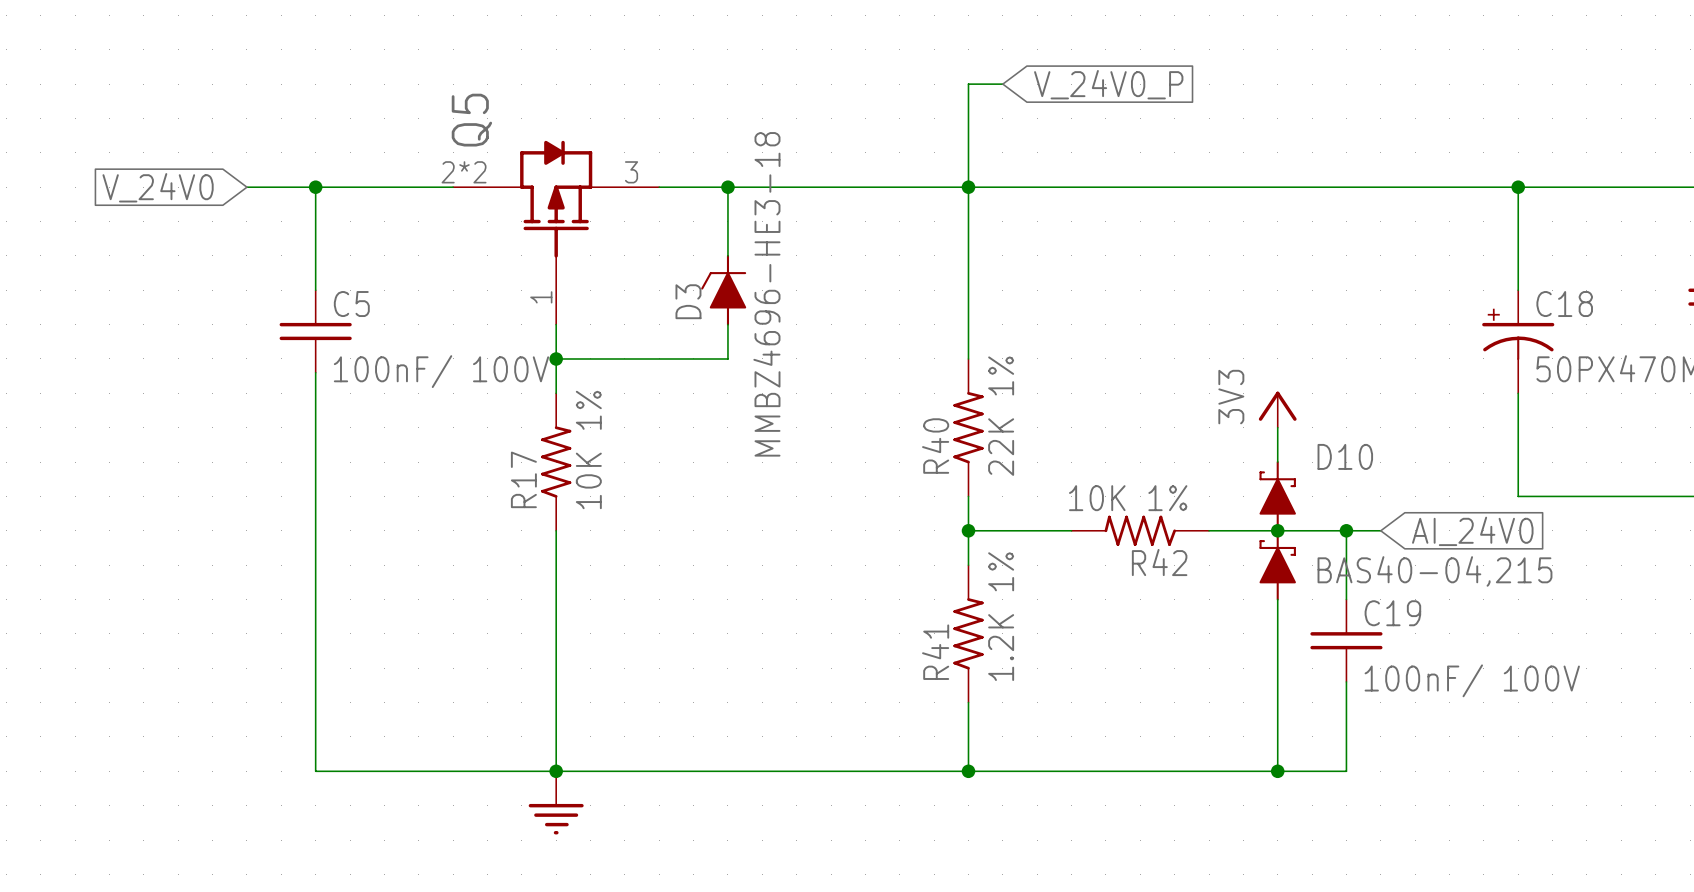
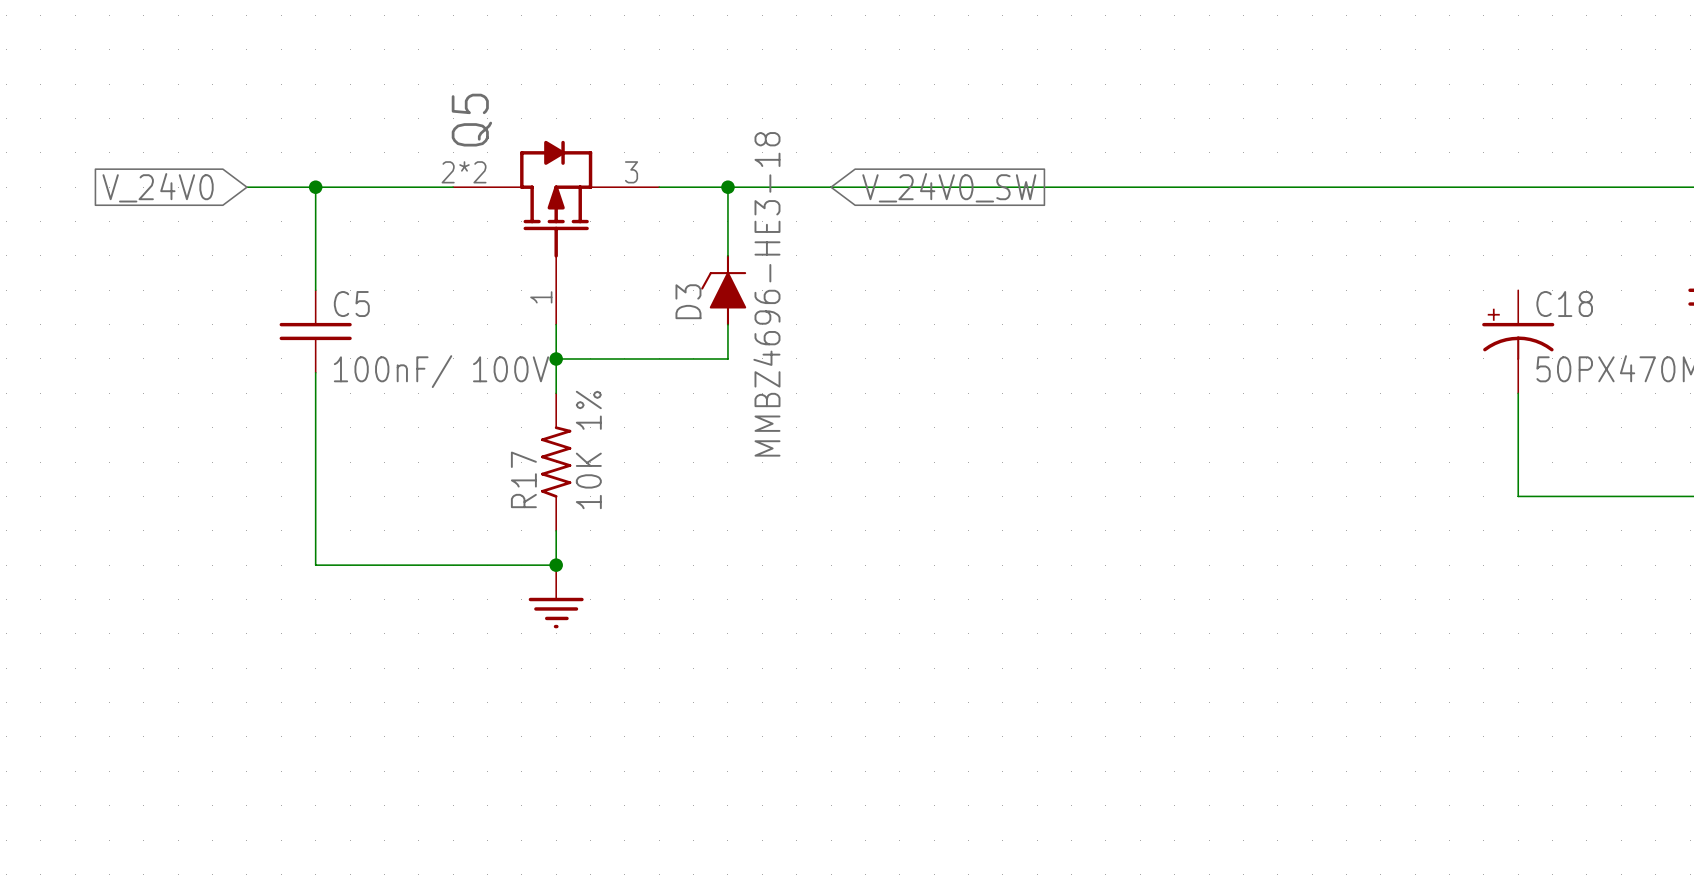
wire: (1002, 84) (968, 84) (968, 358) -> none
global label: V_24V0_P (1108, 84) -> none
global label: none -> V_24V0_SW (949, 187)
junction: (968, 187) -> none
wire: (1518, 187) (1518, 290) -> none
junction: (1518, 187) -> none
power symbol: 3V3 (1277, 409) -> none
R40: 22K 1% (968, 427) -> none
wire: (1277, 427) (1277, 462) -> none
wire: (968, 496) (968, 565) -> none
wire: (968, 530) (1071, 530) -> none
junction: (968, 530) -> none
R42: 10K 1% (1140, 530) -> none
wire: (1209, 530) (1380, 530) -> none
D10: BAS40-04,215 (1277, 530) -> none
junction: (1277, 530) -> none
wire: (1346, 530) (1346, 599) -> none
junction: (1346, 530) -> none
global label: AI_24V0 (1472, 531) -> none
wire: (315, 565) (315, 771) (1346, 771) (1346, 681) -> none
wire: (556, 565) (556, 771) -> (556, 565) (315, 565)
junction: none -> (556, 565)
wire: (1277, 599) (1277, 771) -> none
R41: 1.2K 1% (968, 633) -> none
C19: 100nF/ 100V (1346, 640) -> none
wire: (968, 702) (968, 771) -> none
junction: (556, 771) -> none
junction: (968, 771) -> none
junction: (1277, 771) -> none
power symbol position: (556, 802) -> (556, 596)

